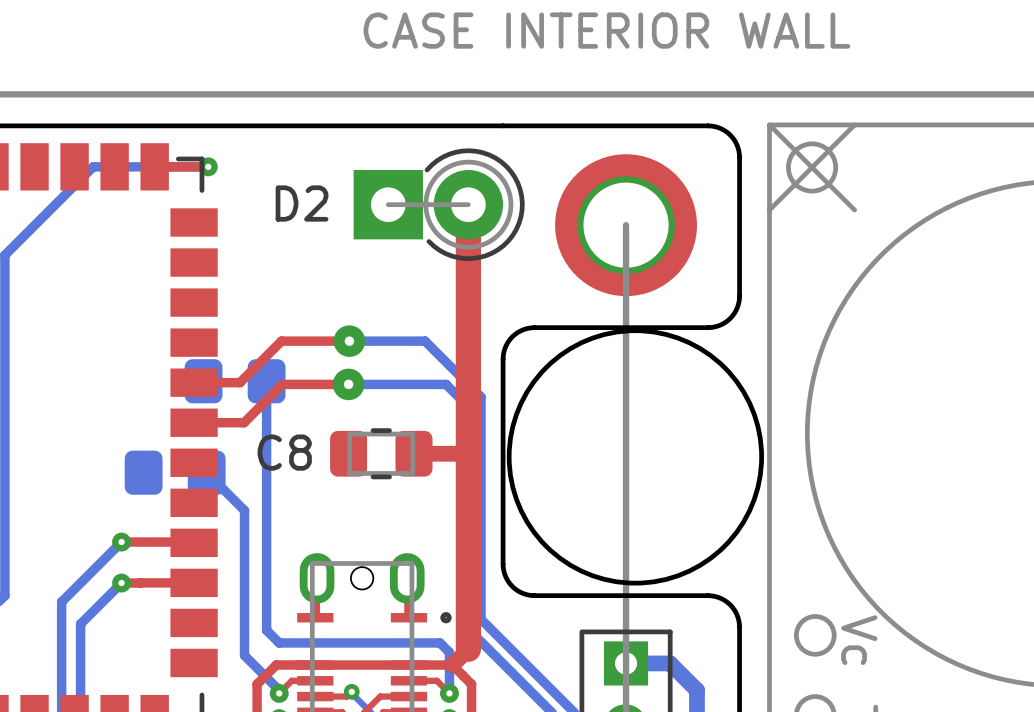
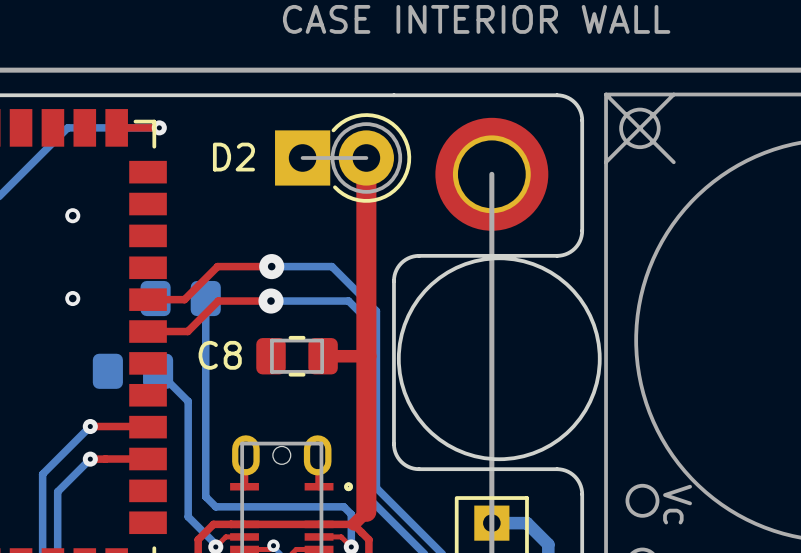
via: none -> (72, 215)
via: none -> (72, 298)

